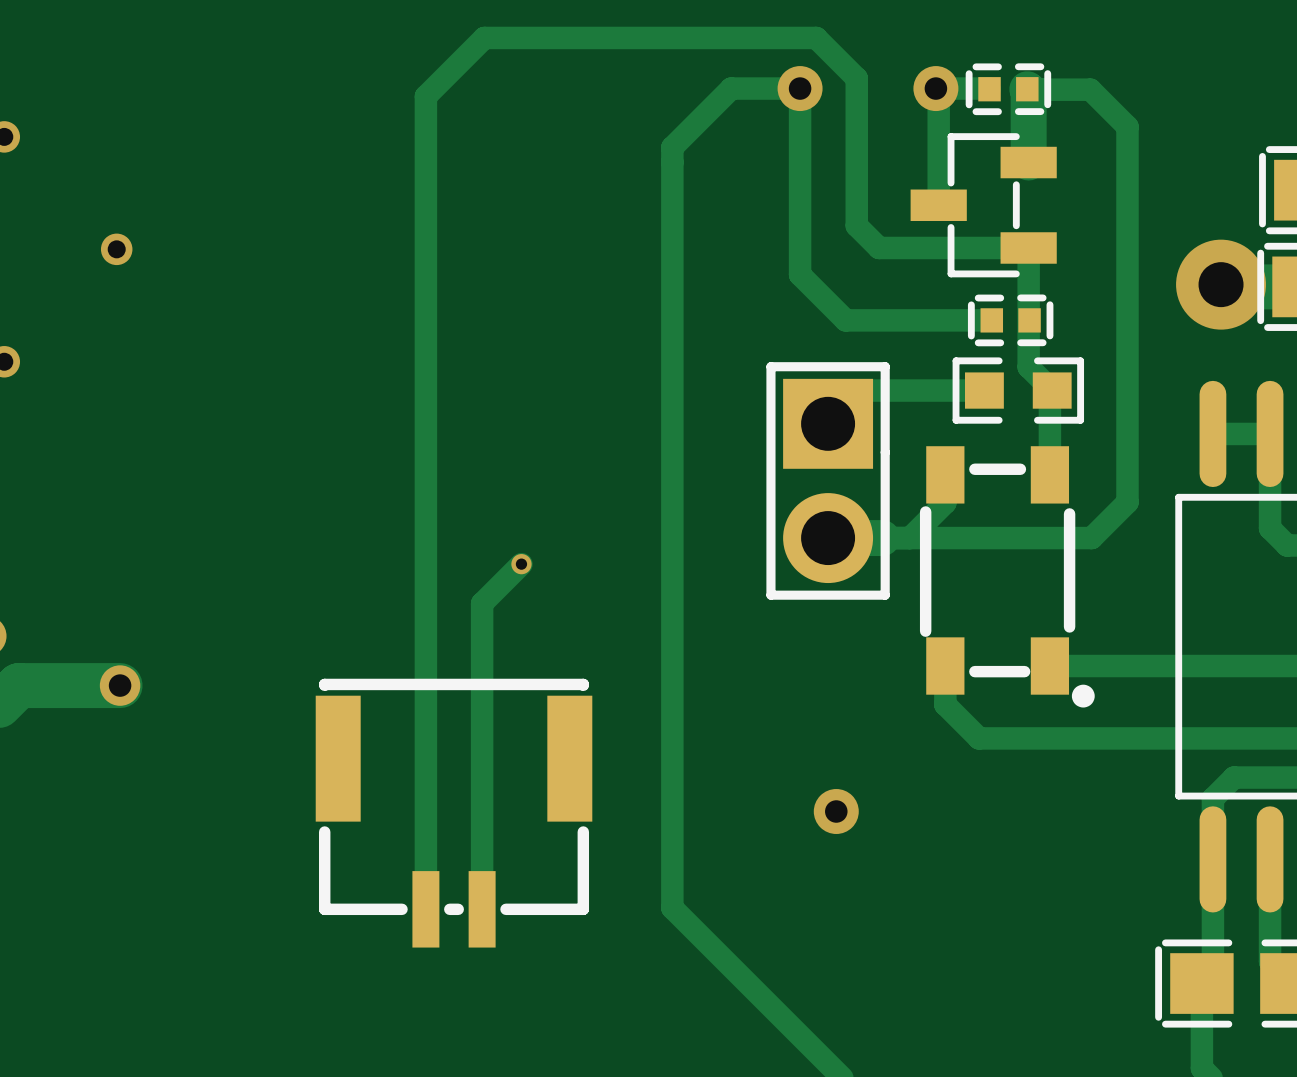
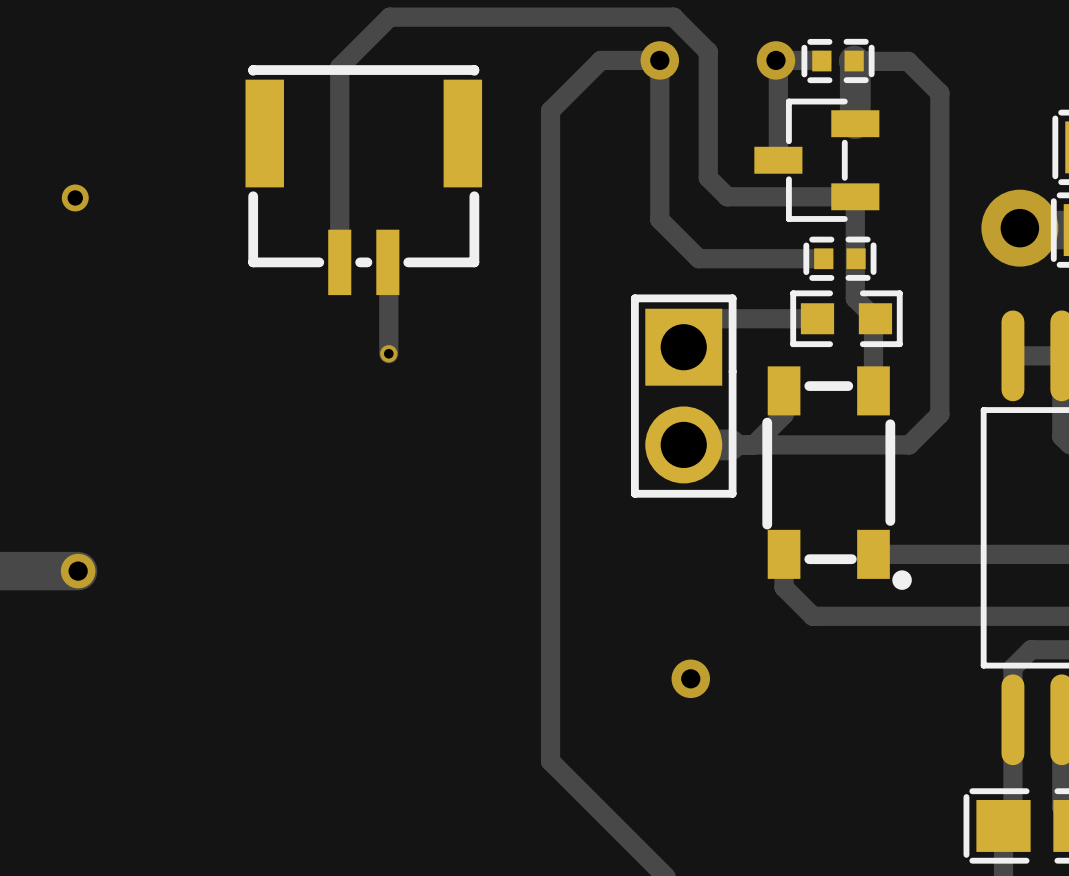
track: (425, 324) (425, 909) -> none
track: none -> (388, 263) (388, 353)
track: (521, 564) (482, 603) (482, 909) -> none
via position: (521, 564) -> (388, 353)
part position: (454, 813) -> (363, 180)

